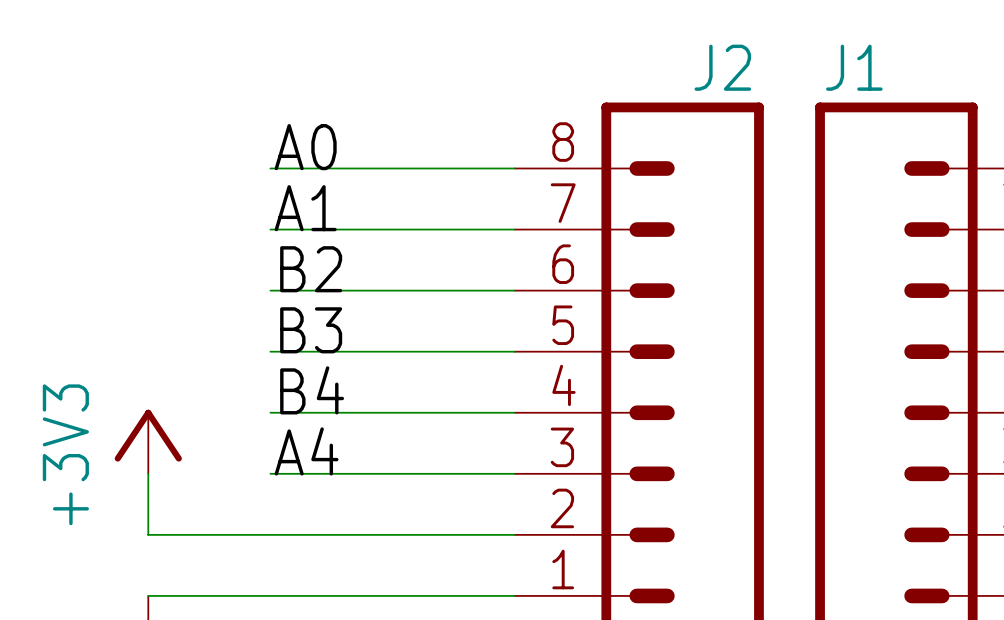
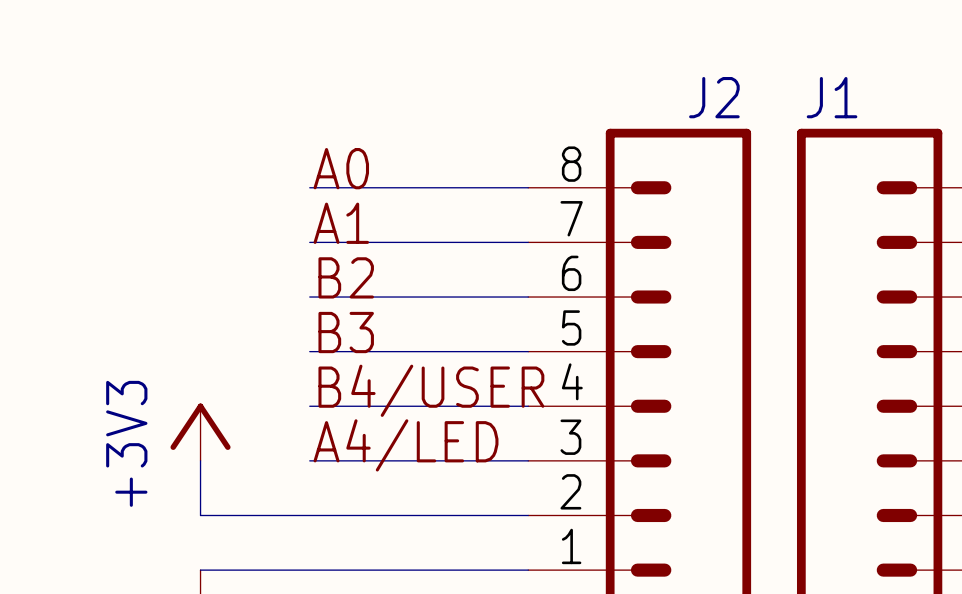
label: B4 (312, 390) -> B4/USER (431, 390)
label: A4 (306, 451) -> A4/LED (406, 445)

